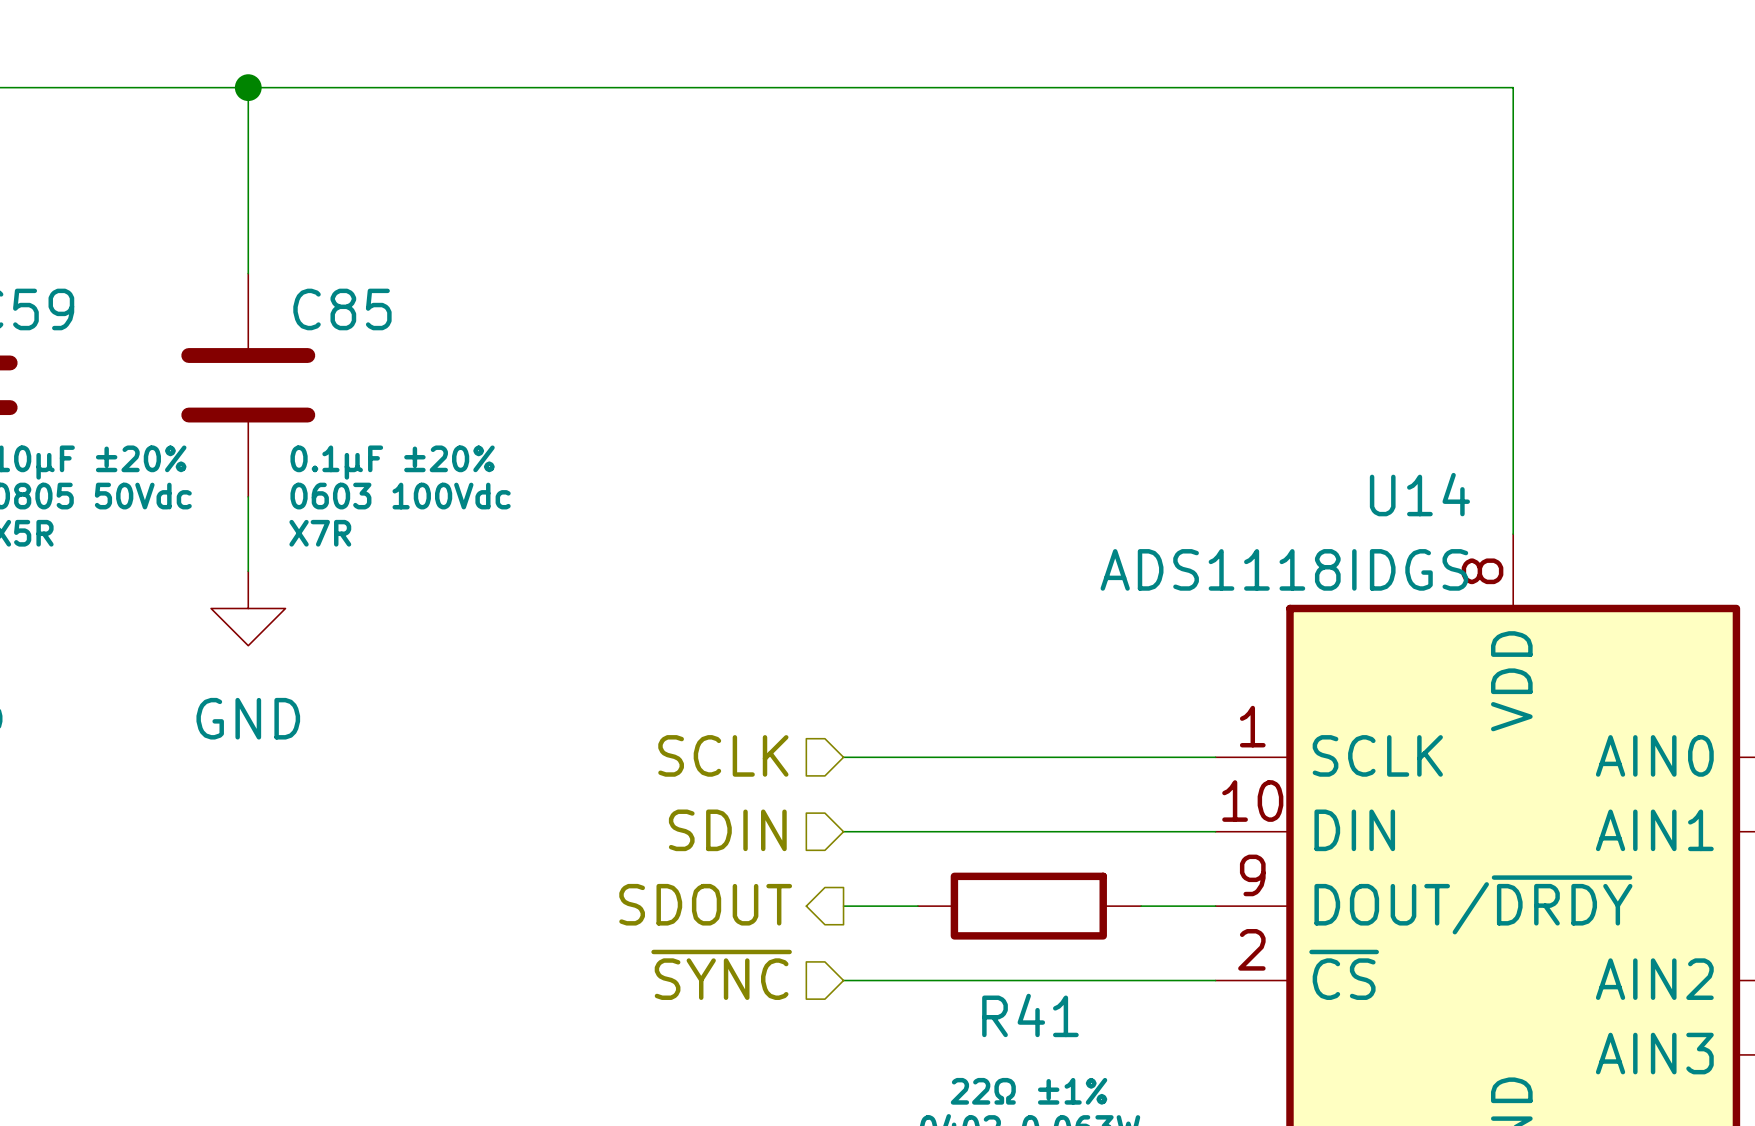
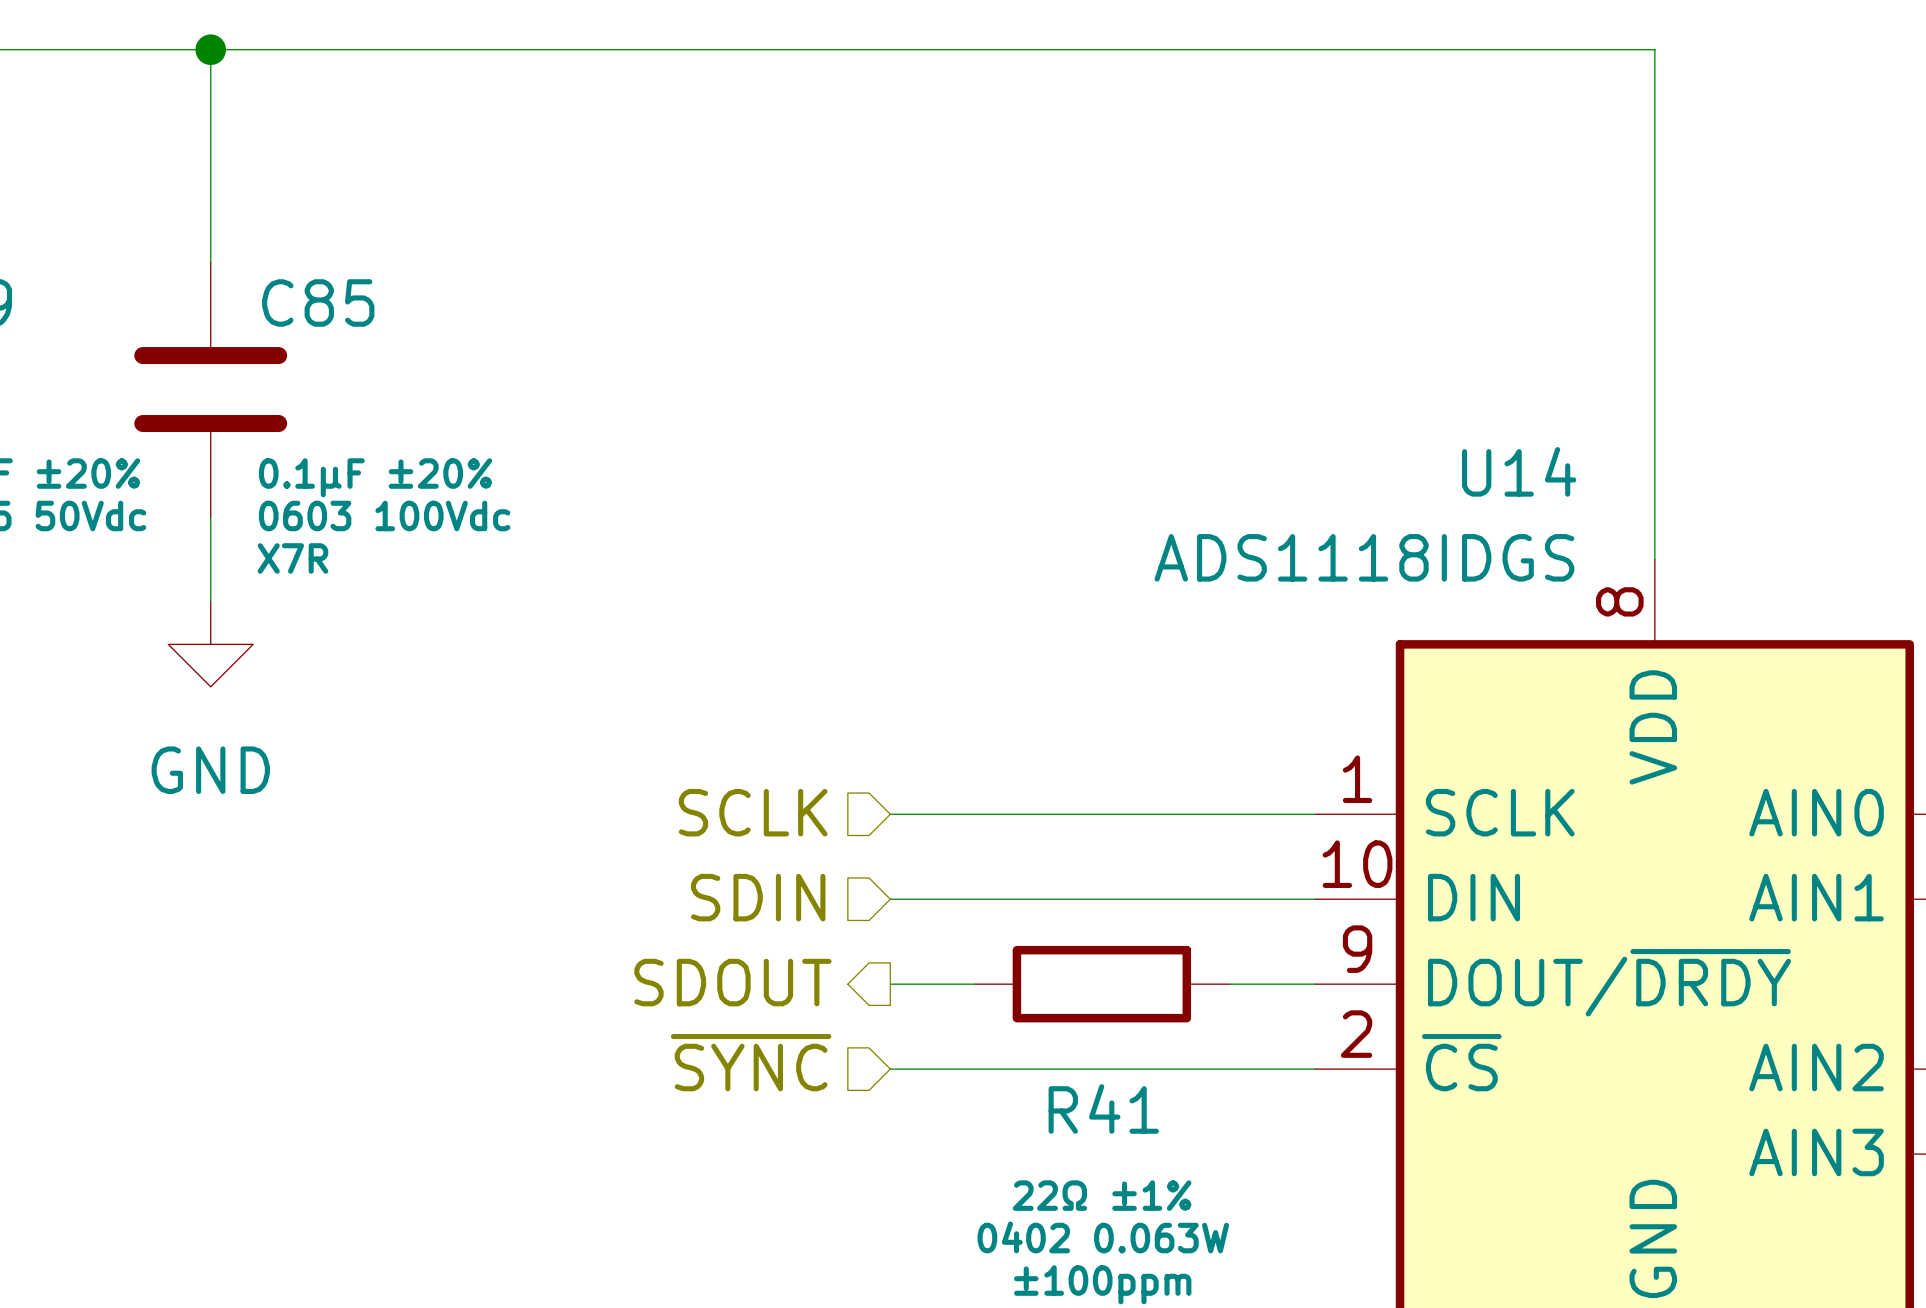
U14 name position: U14 (1419, 494) -> U14 (1519, 471)
U14 value position: ADS1118IDGS (1284, 569) -> ADS1118IDGS (1364, 557)

